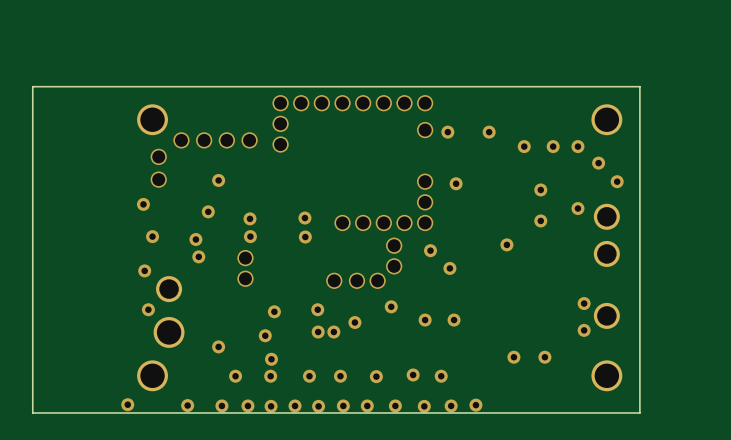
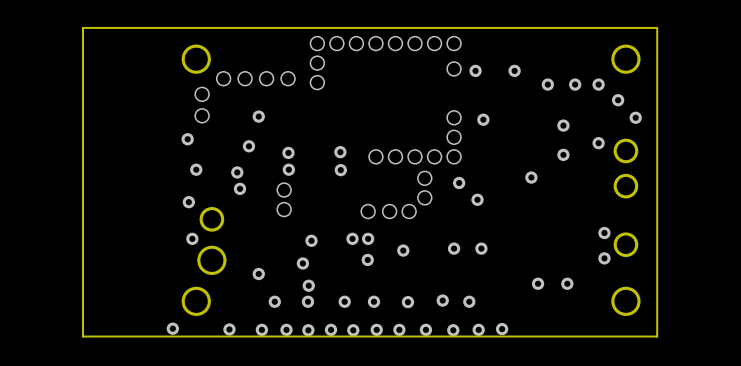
via: (391, 306) -> none
via: none -> (368, 238)
via: (354, 322) -> none
via: none -> (403, 250)
via: (318, 332) -> none

